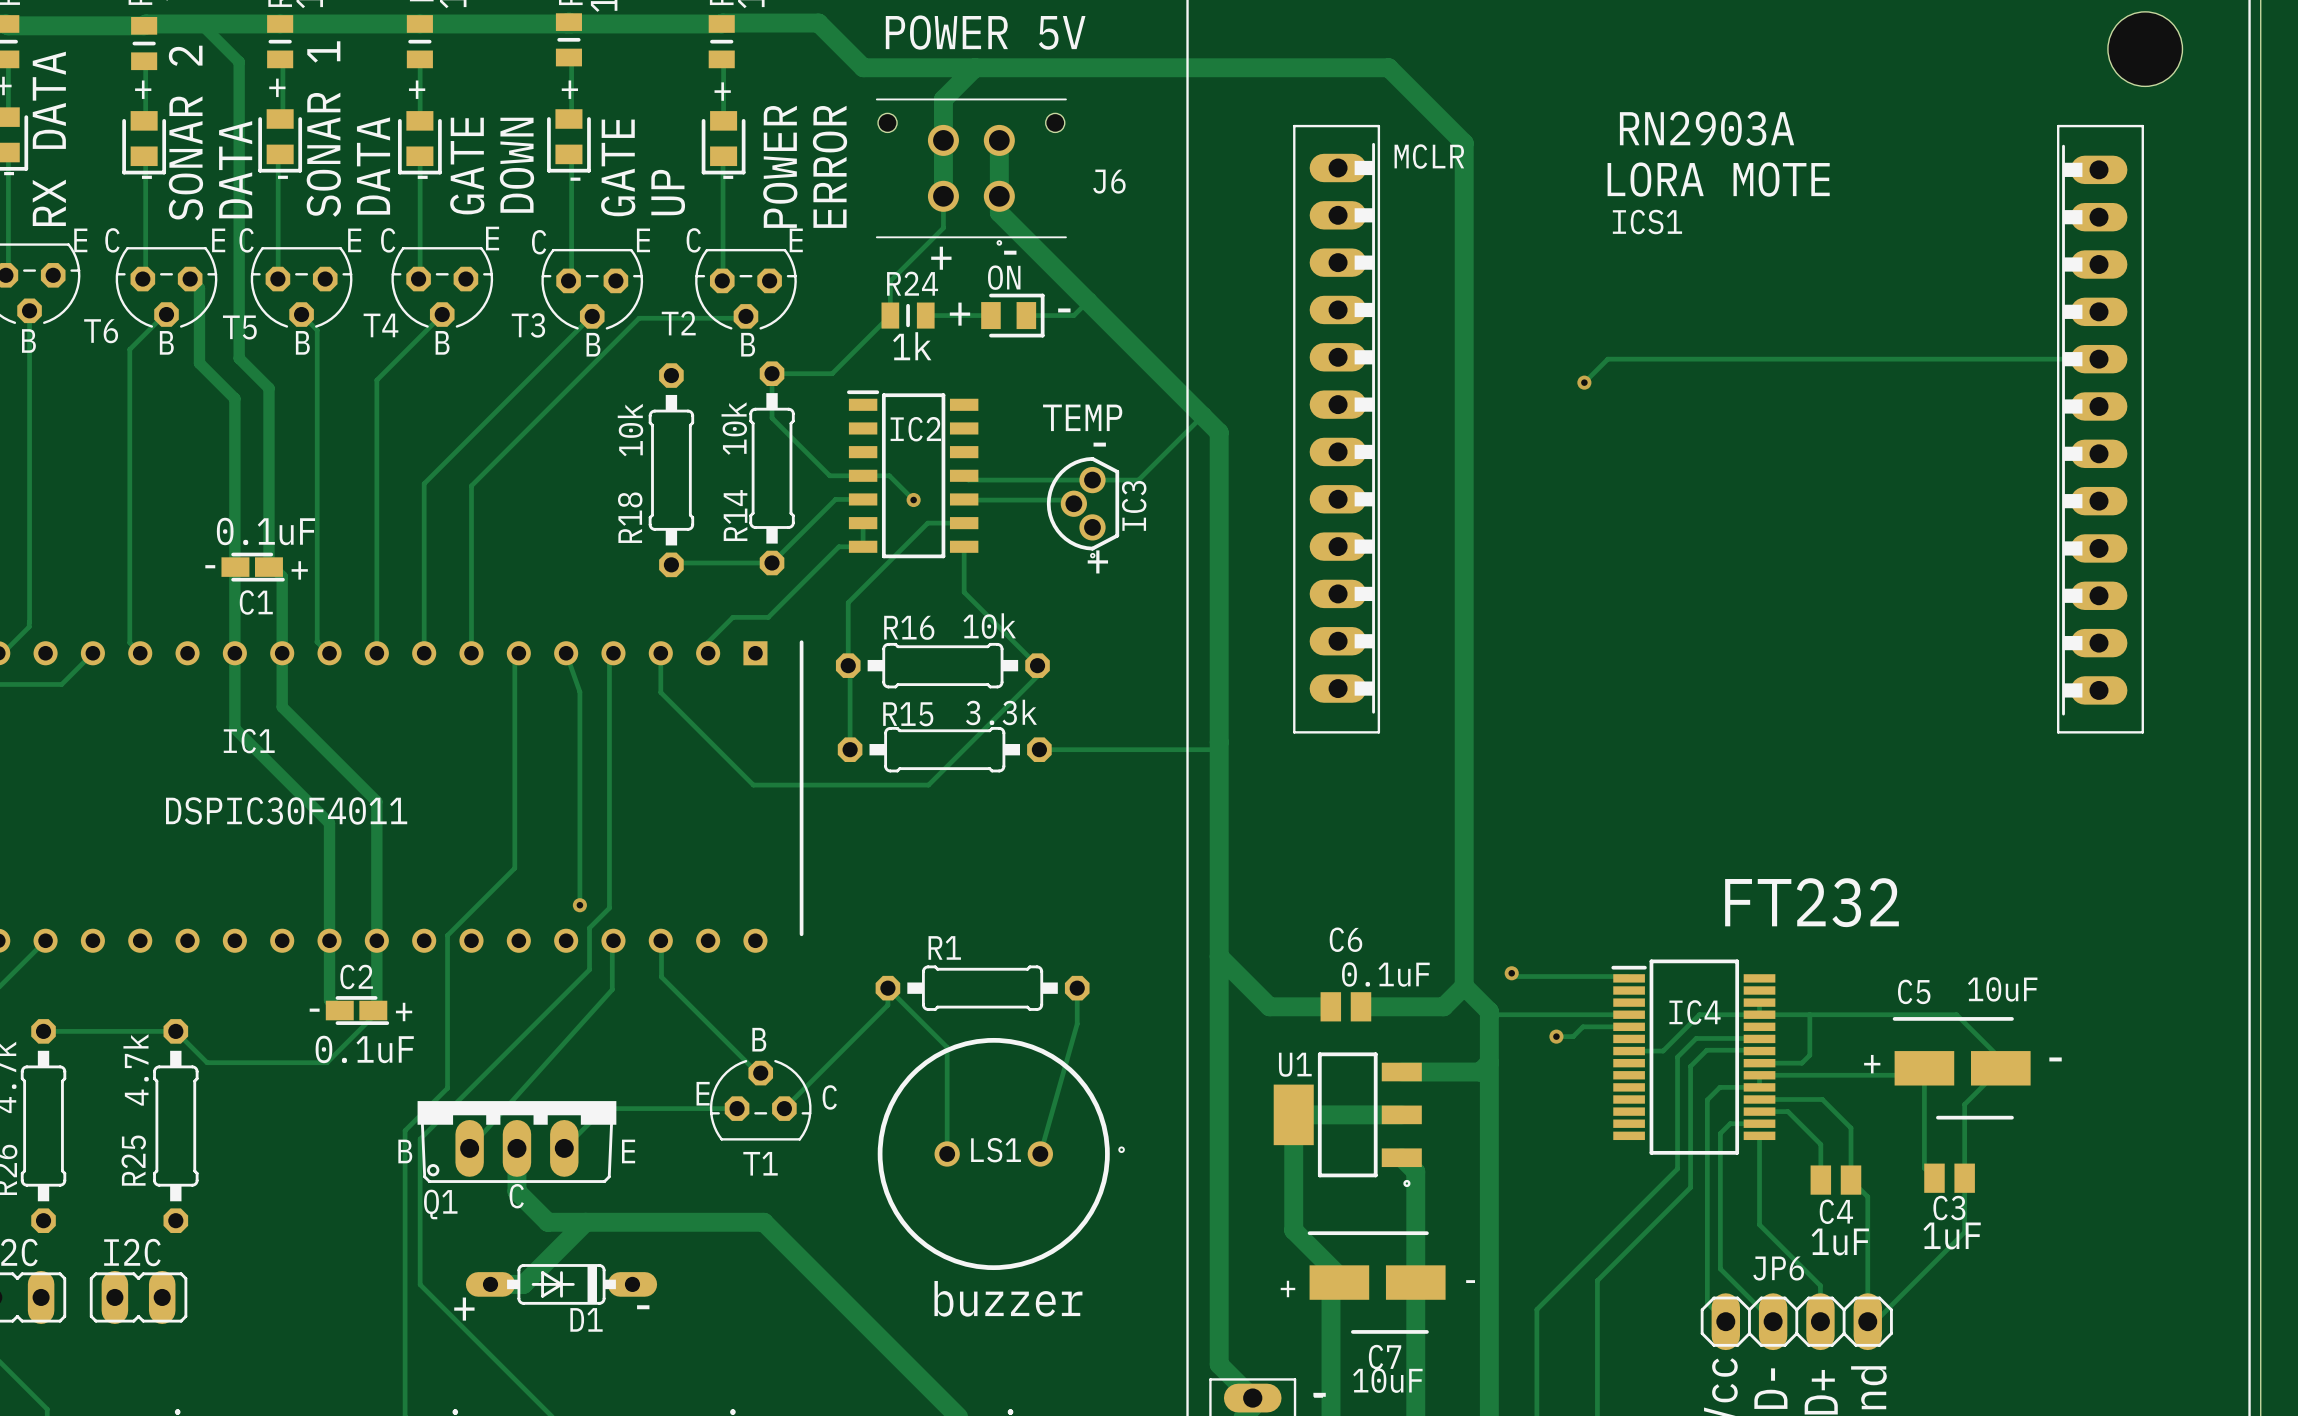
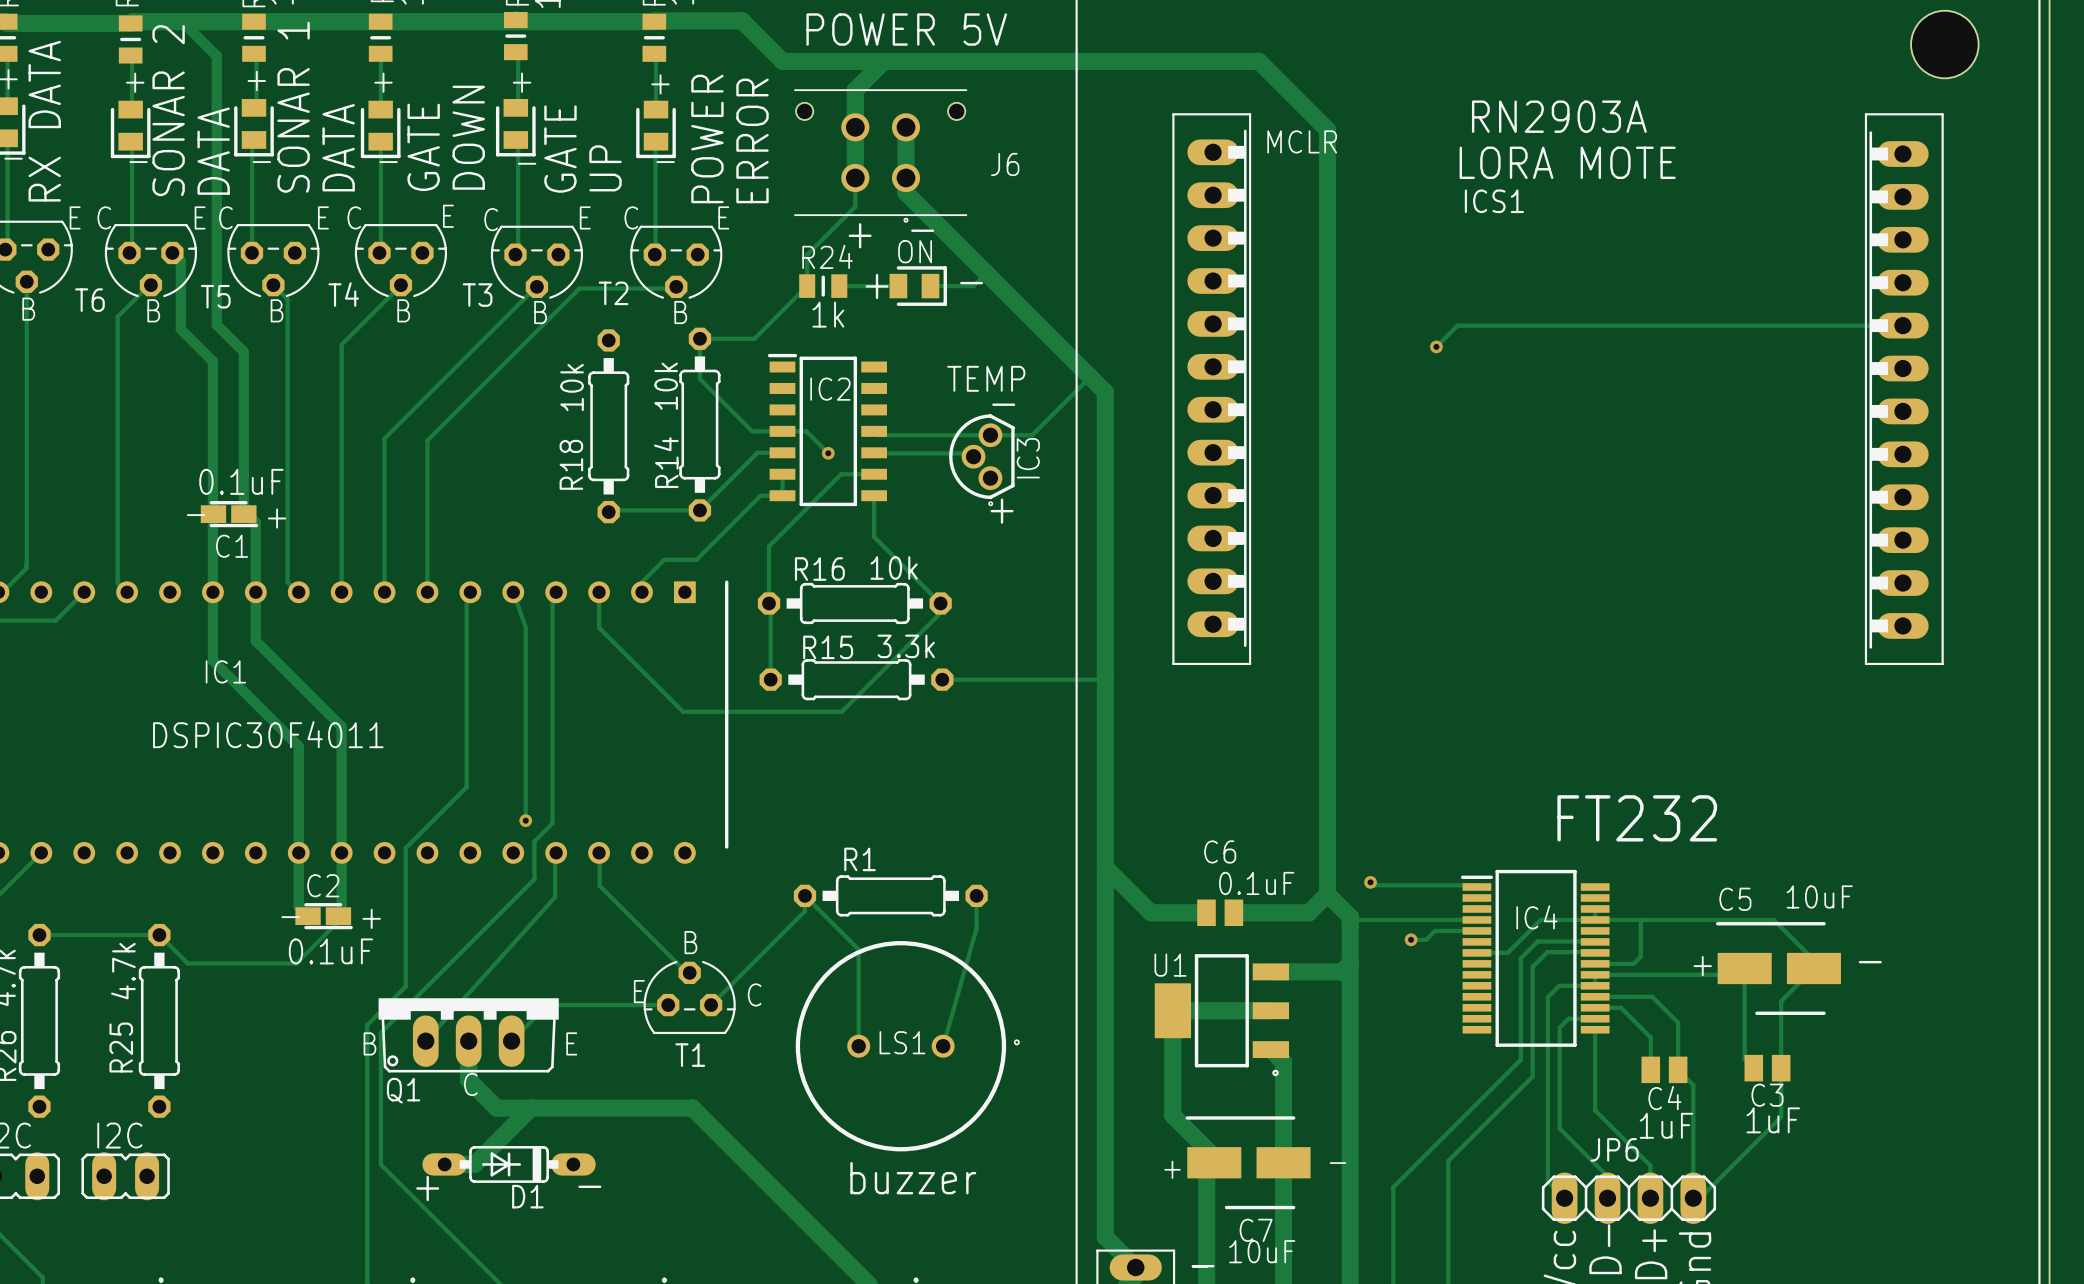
track: (1720, 1244) (1720, 1268) (1771, 1319) -> (1559, 1128) (1605, 1174) (1605, 1196)

